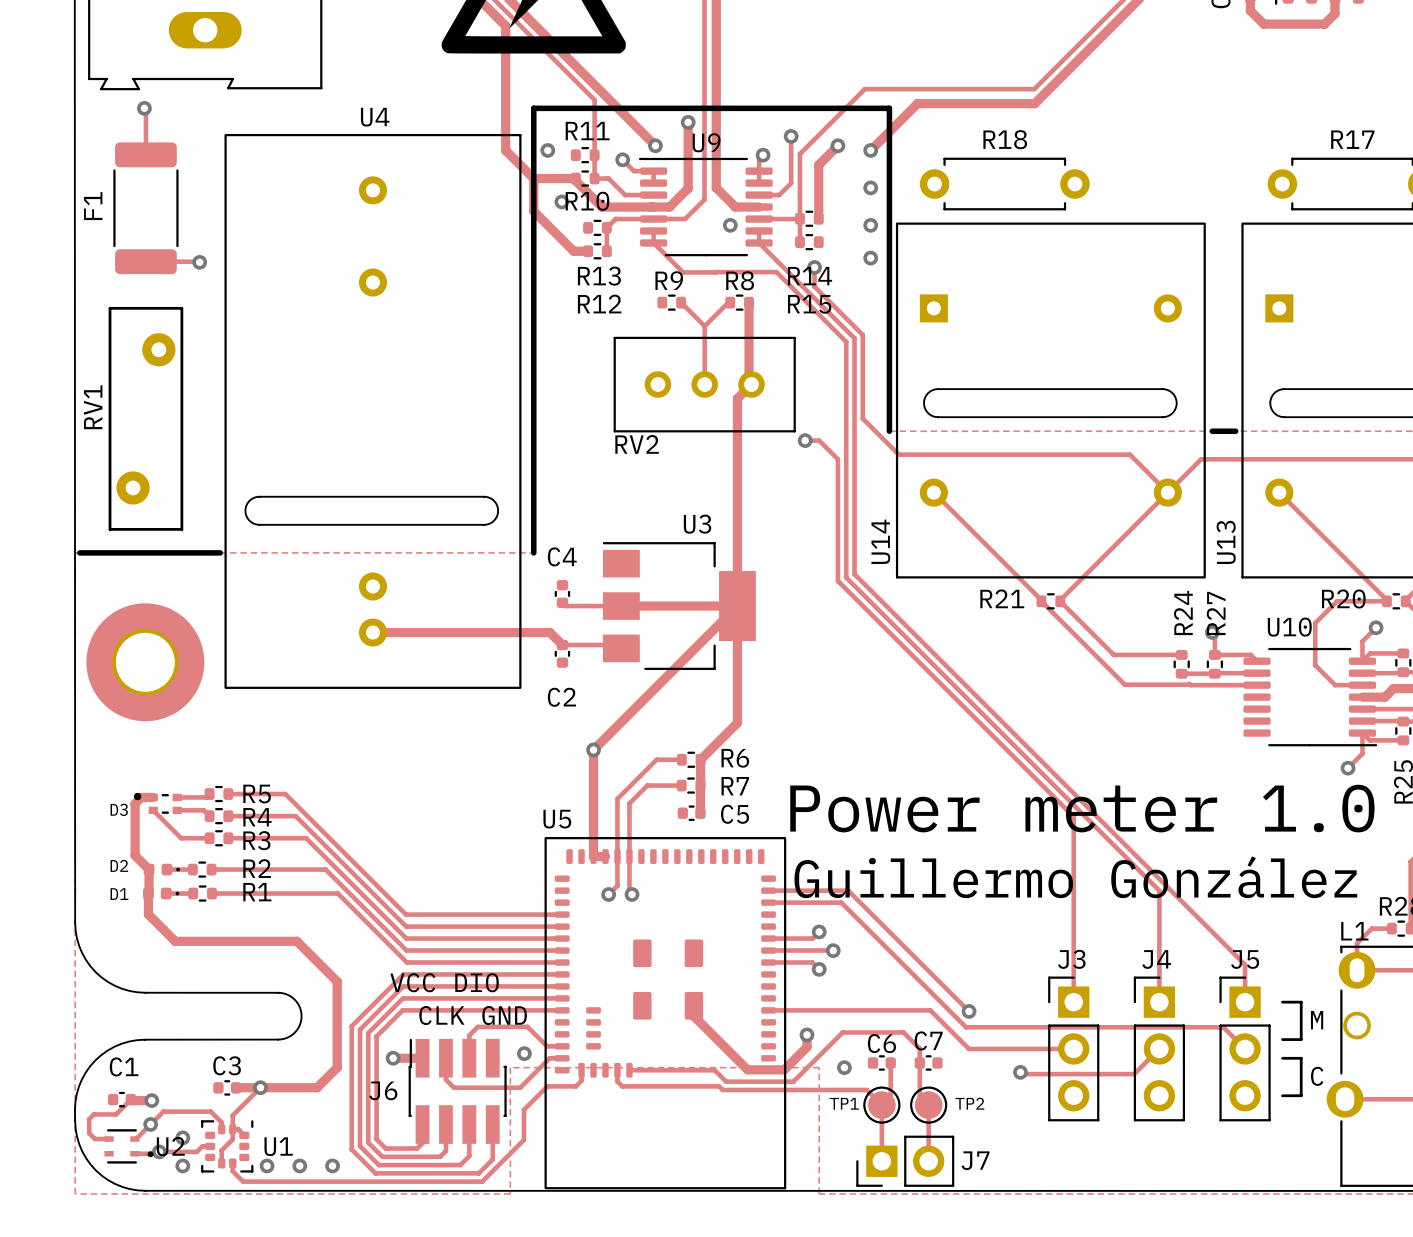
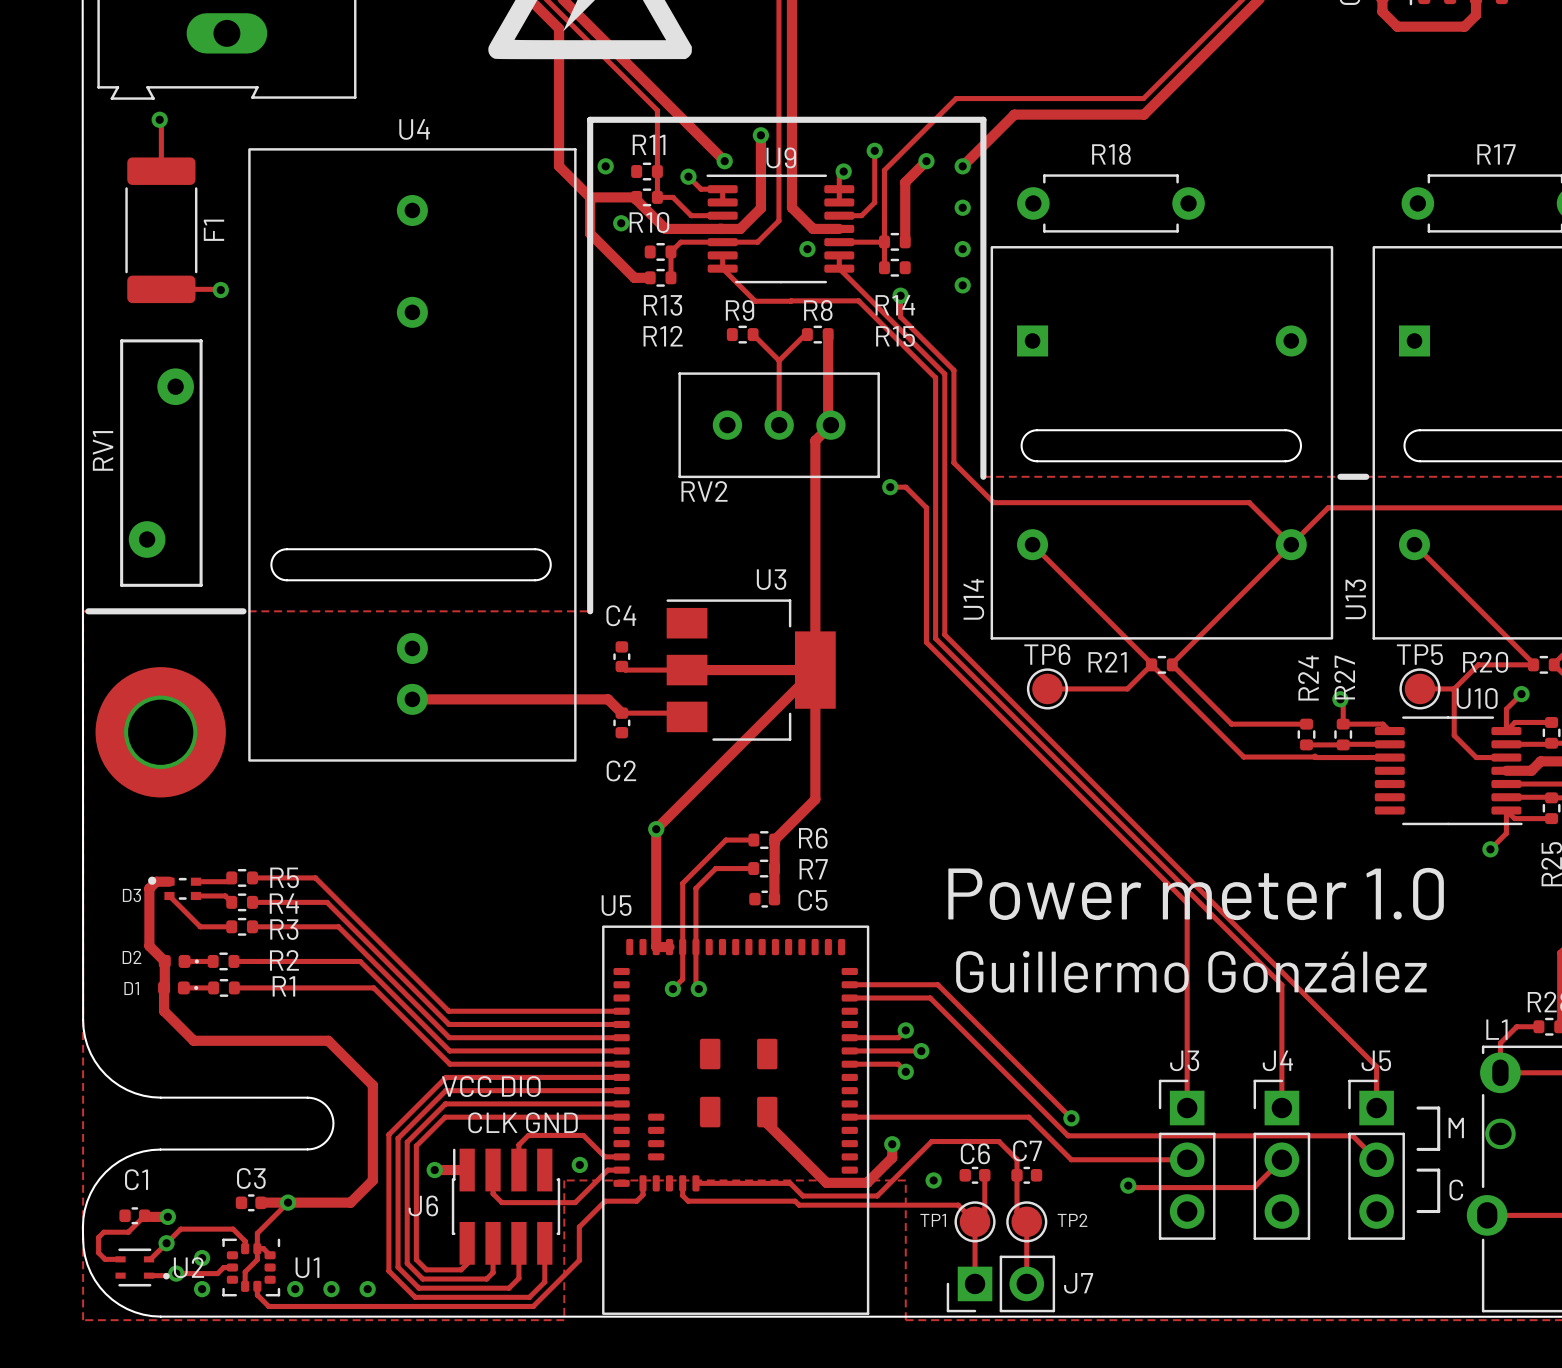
F1 name position: F1 (93, 206) -> F1 (213, 230)
track: none -> (1151, 664) (1127, 688) (1047, 688)
TP6: none -> (1047, 688)
track: none -> (1420, 688) (1454, 688)
TP5: none -> (1420, 688)
U10 name position: U10 (1289, 627) -> U10 (1477, 698)

